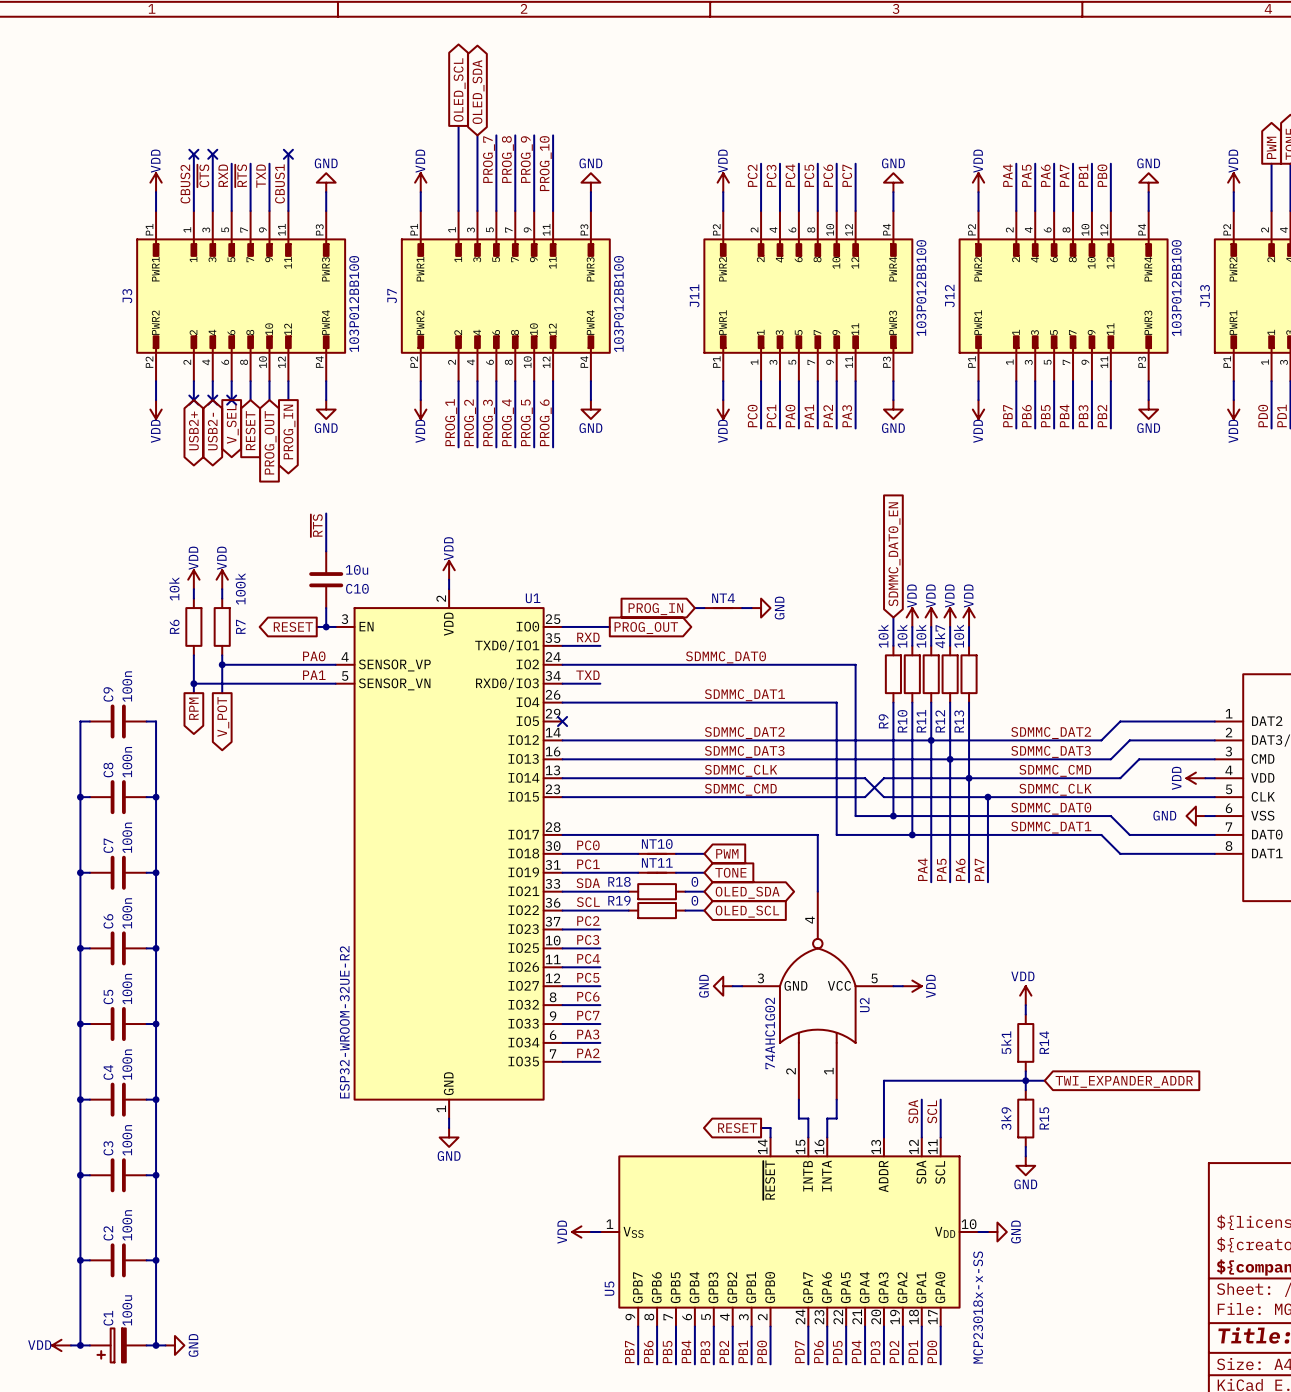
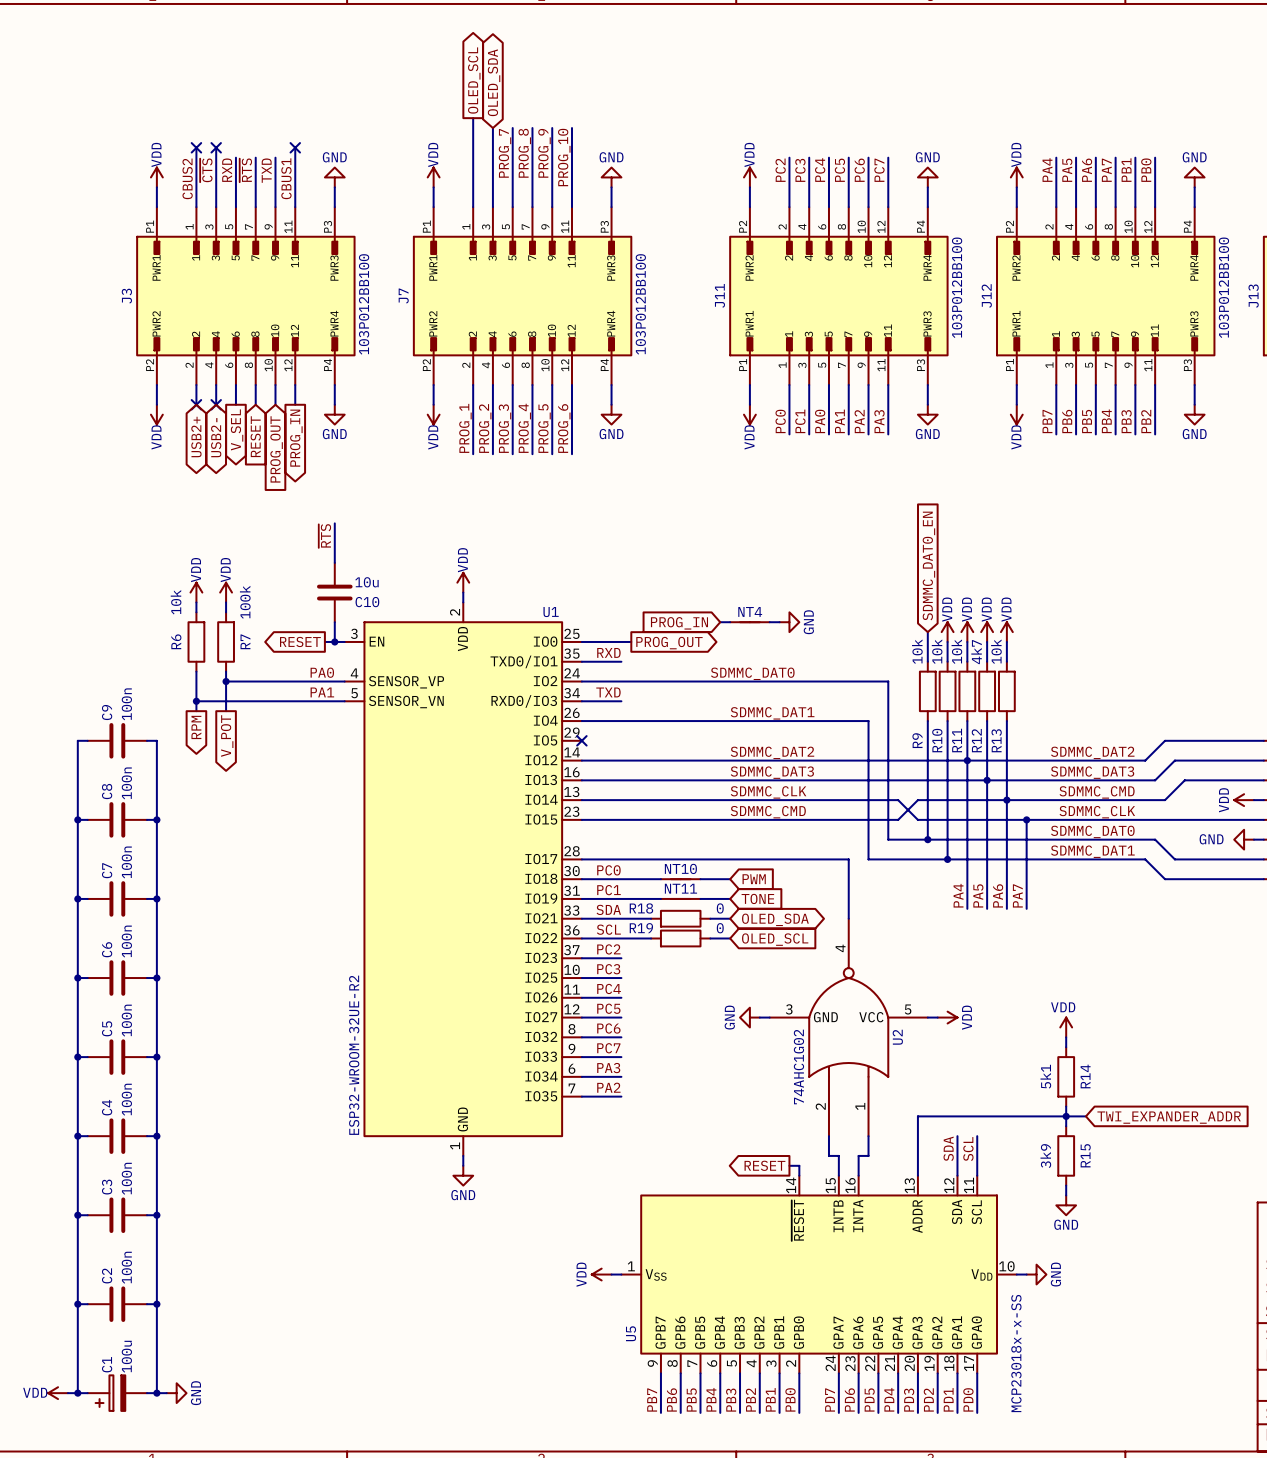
no-connect mark: (231, 400) -> none

